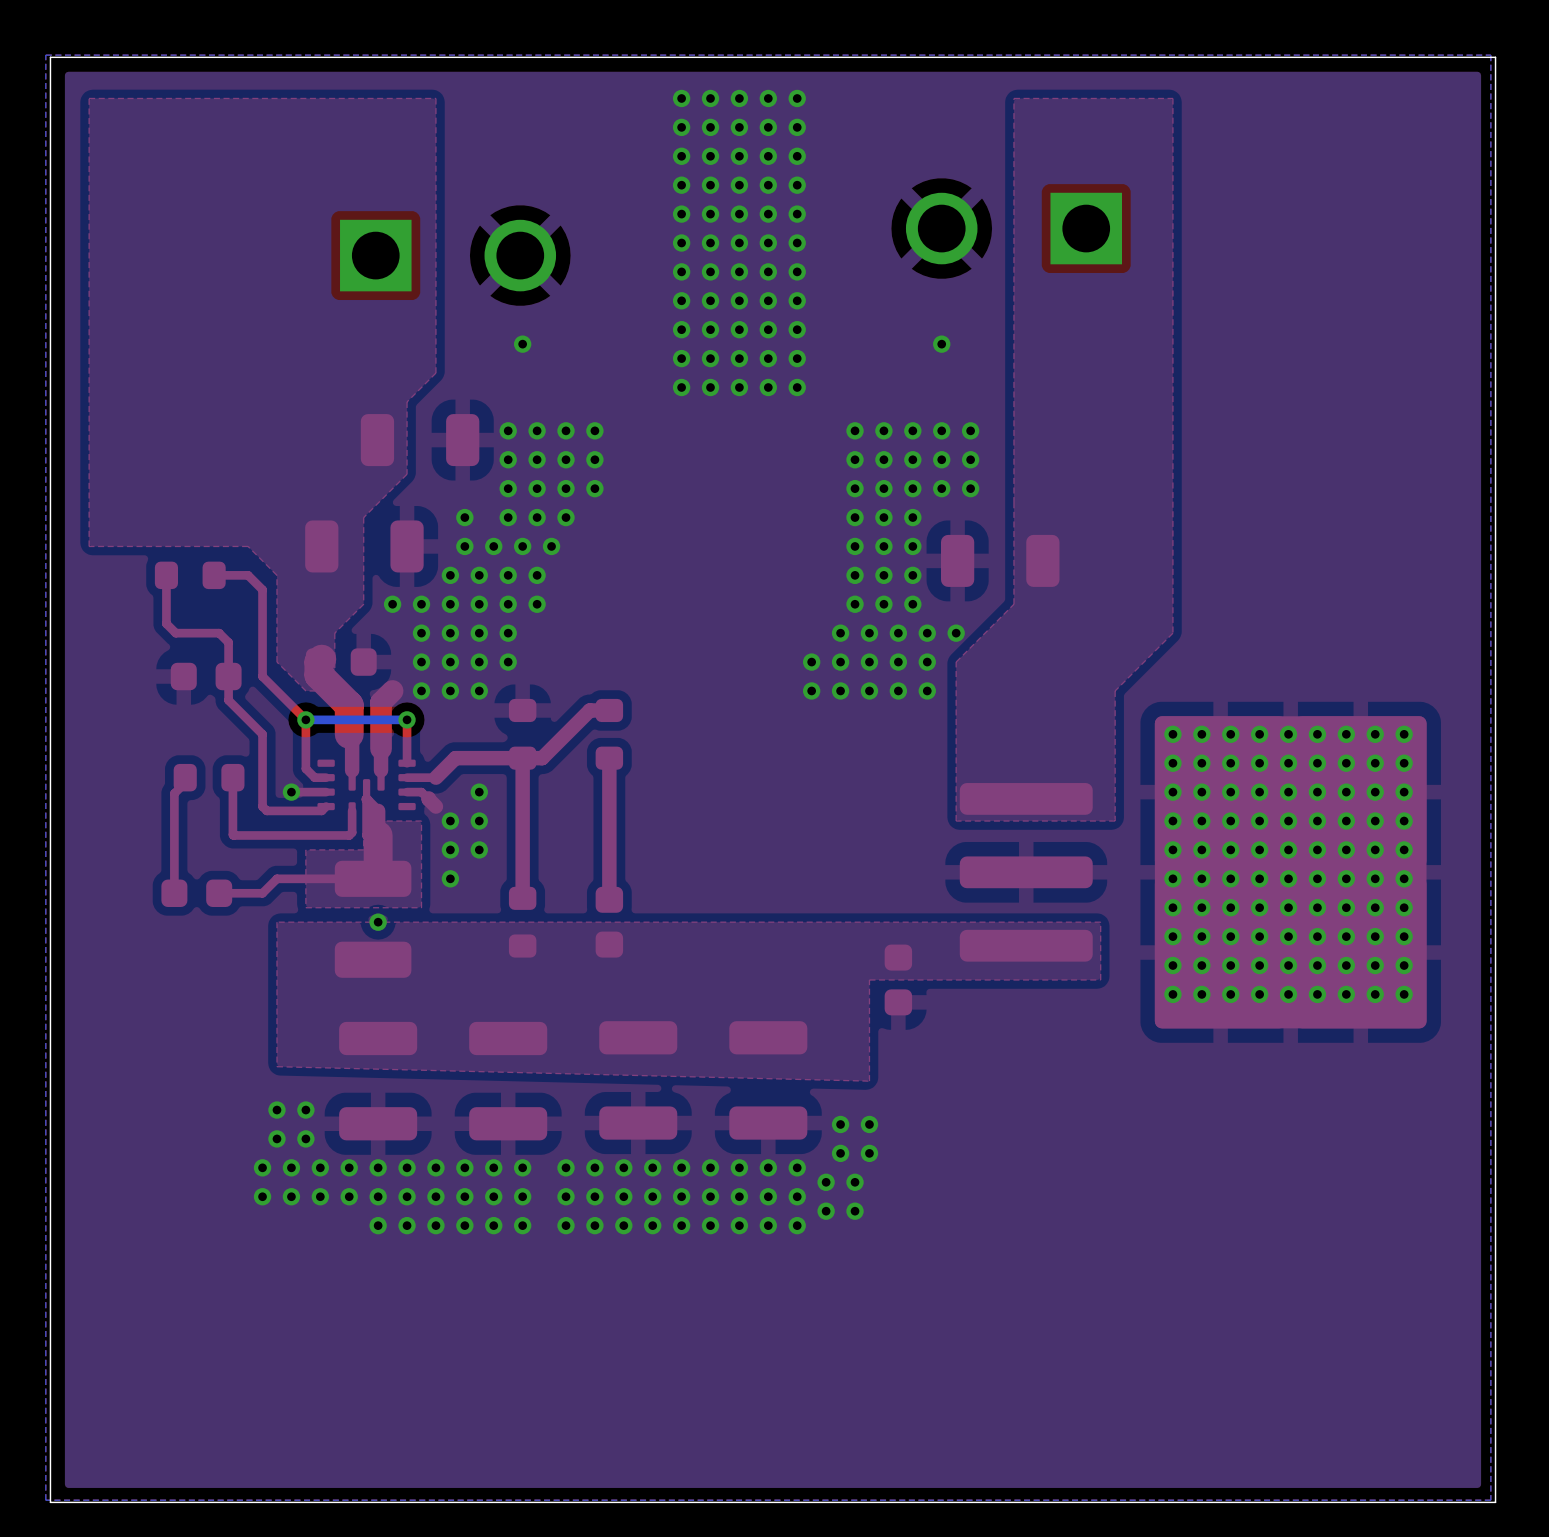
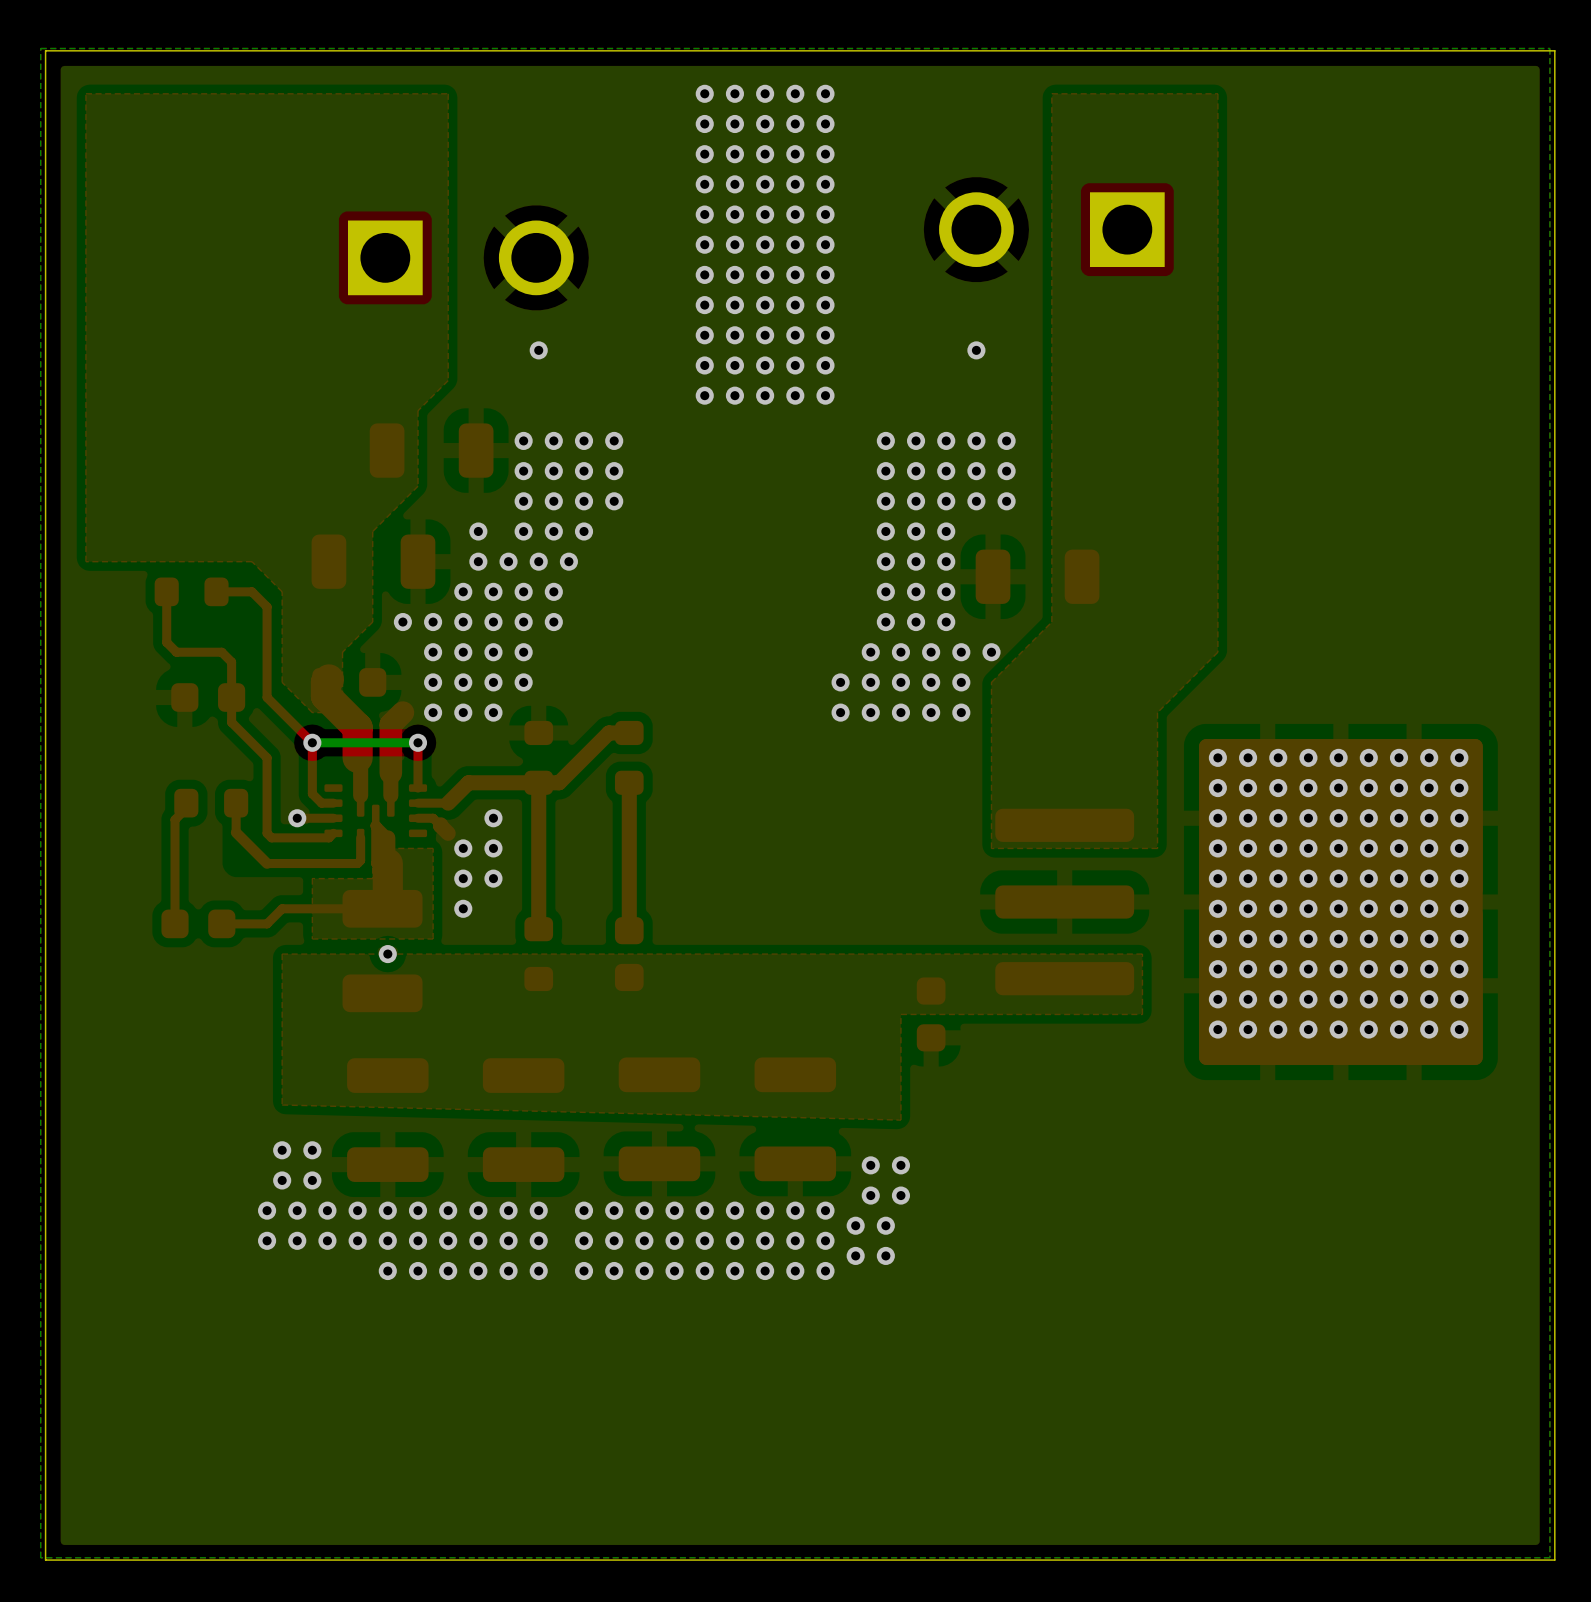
top track: (232, 805) (232, 834) (262, 835) -> (236, 832) (267, 863)

